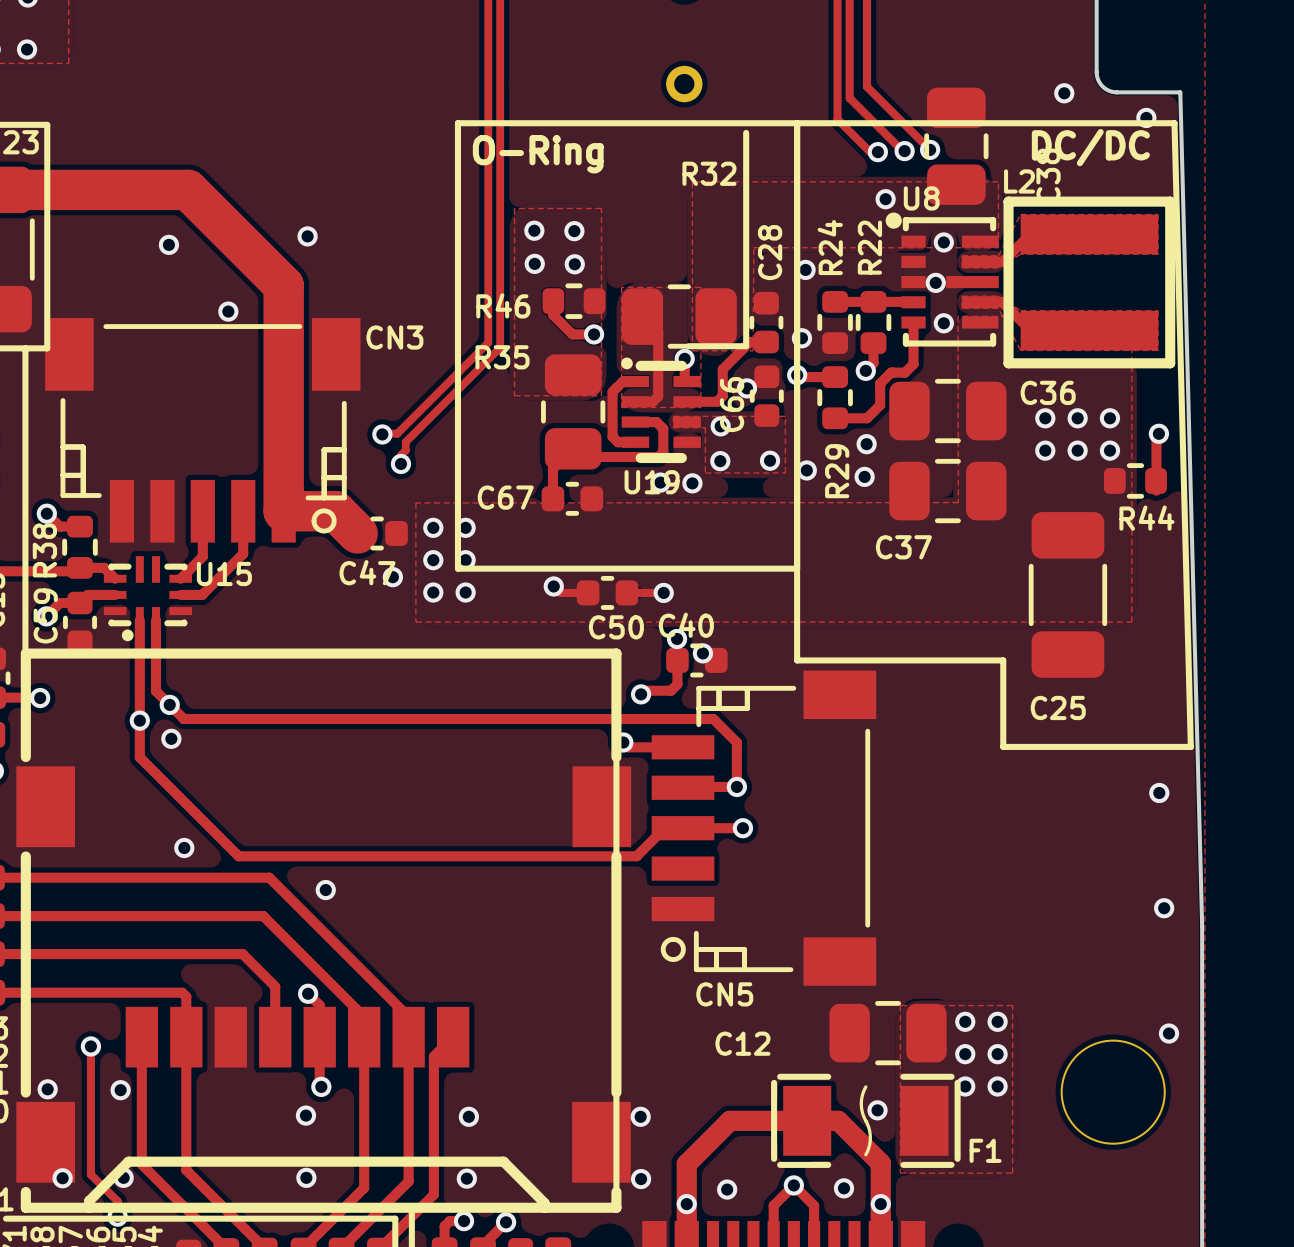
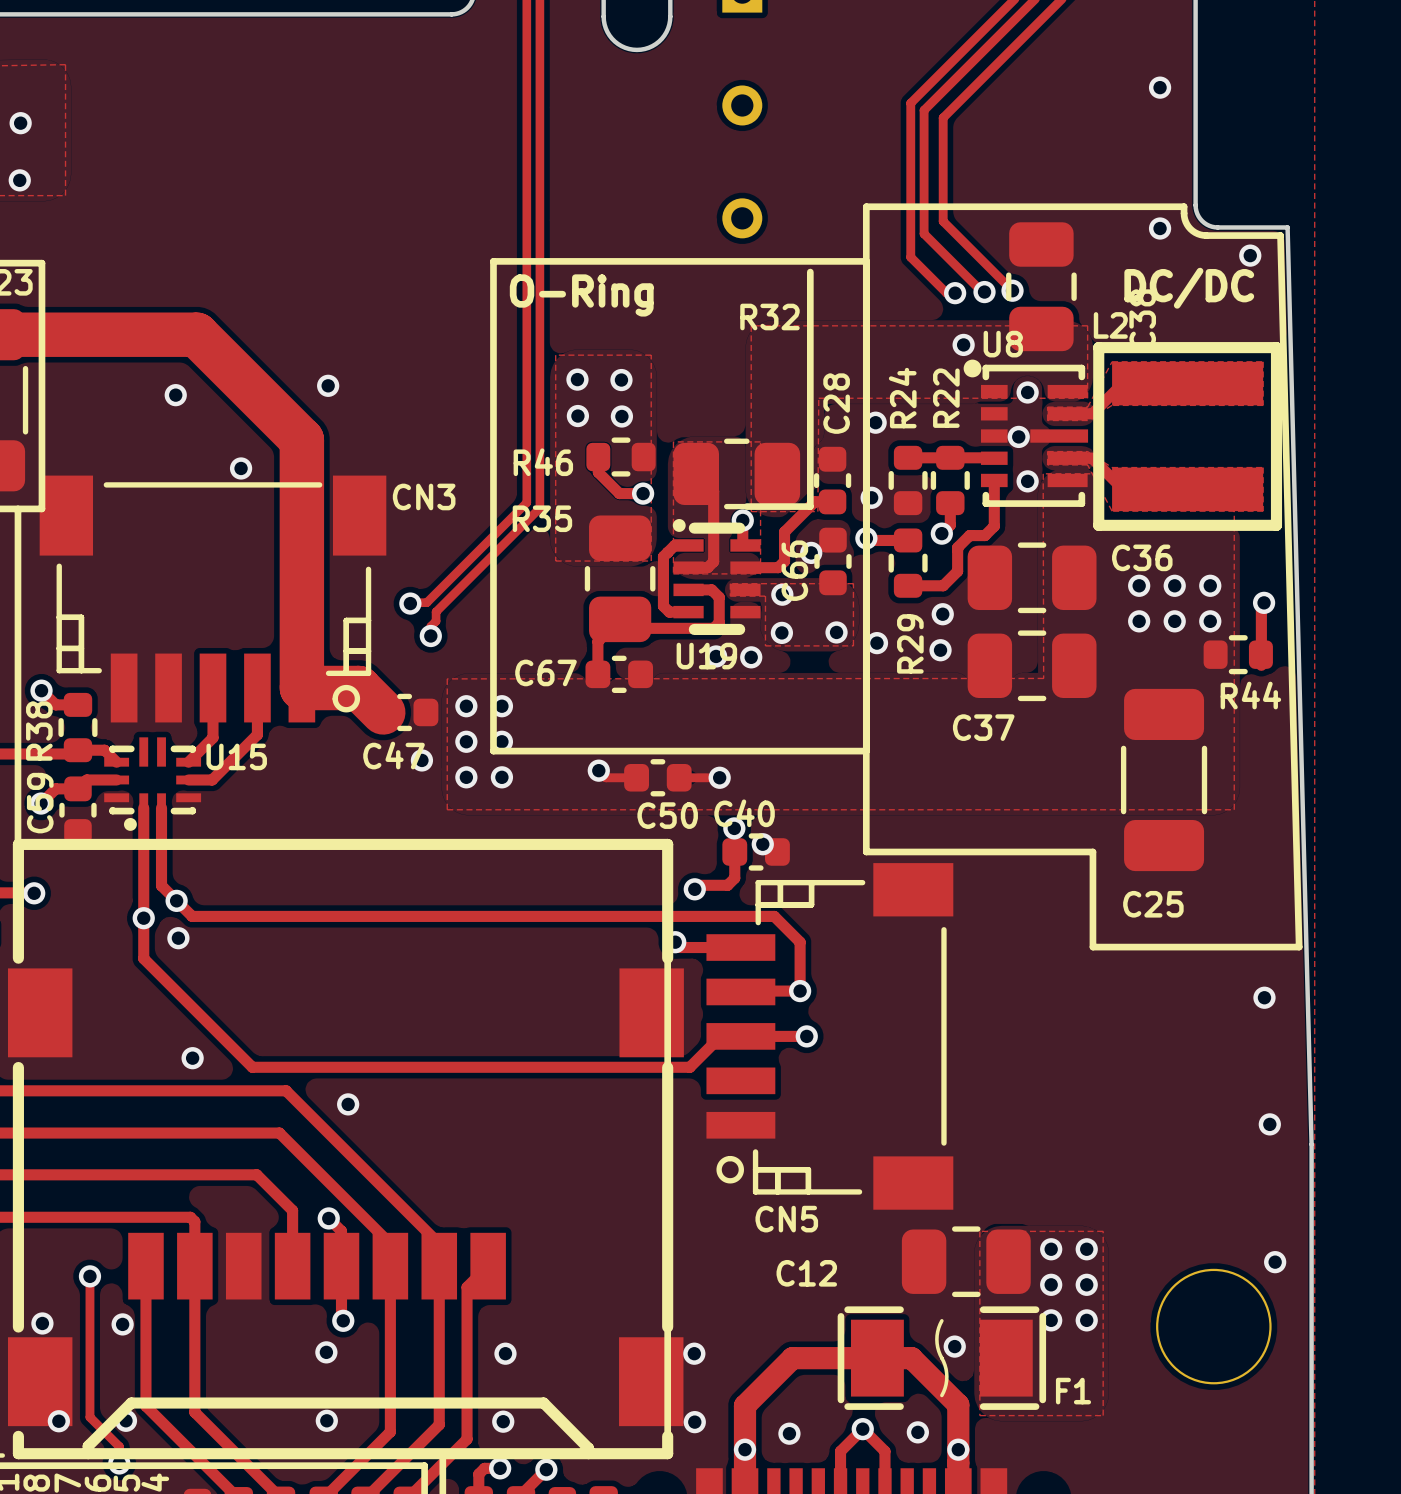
line: (797, 123) (1174, 123) -> (866, 261) (866, 206) (1184, 206) (1187, 224) (1192, 230) (1200, 234) (1280, 235) (1281, 261)

